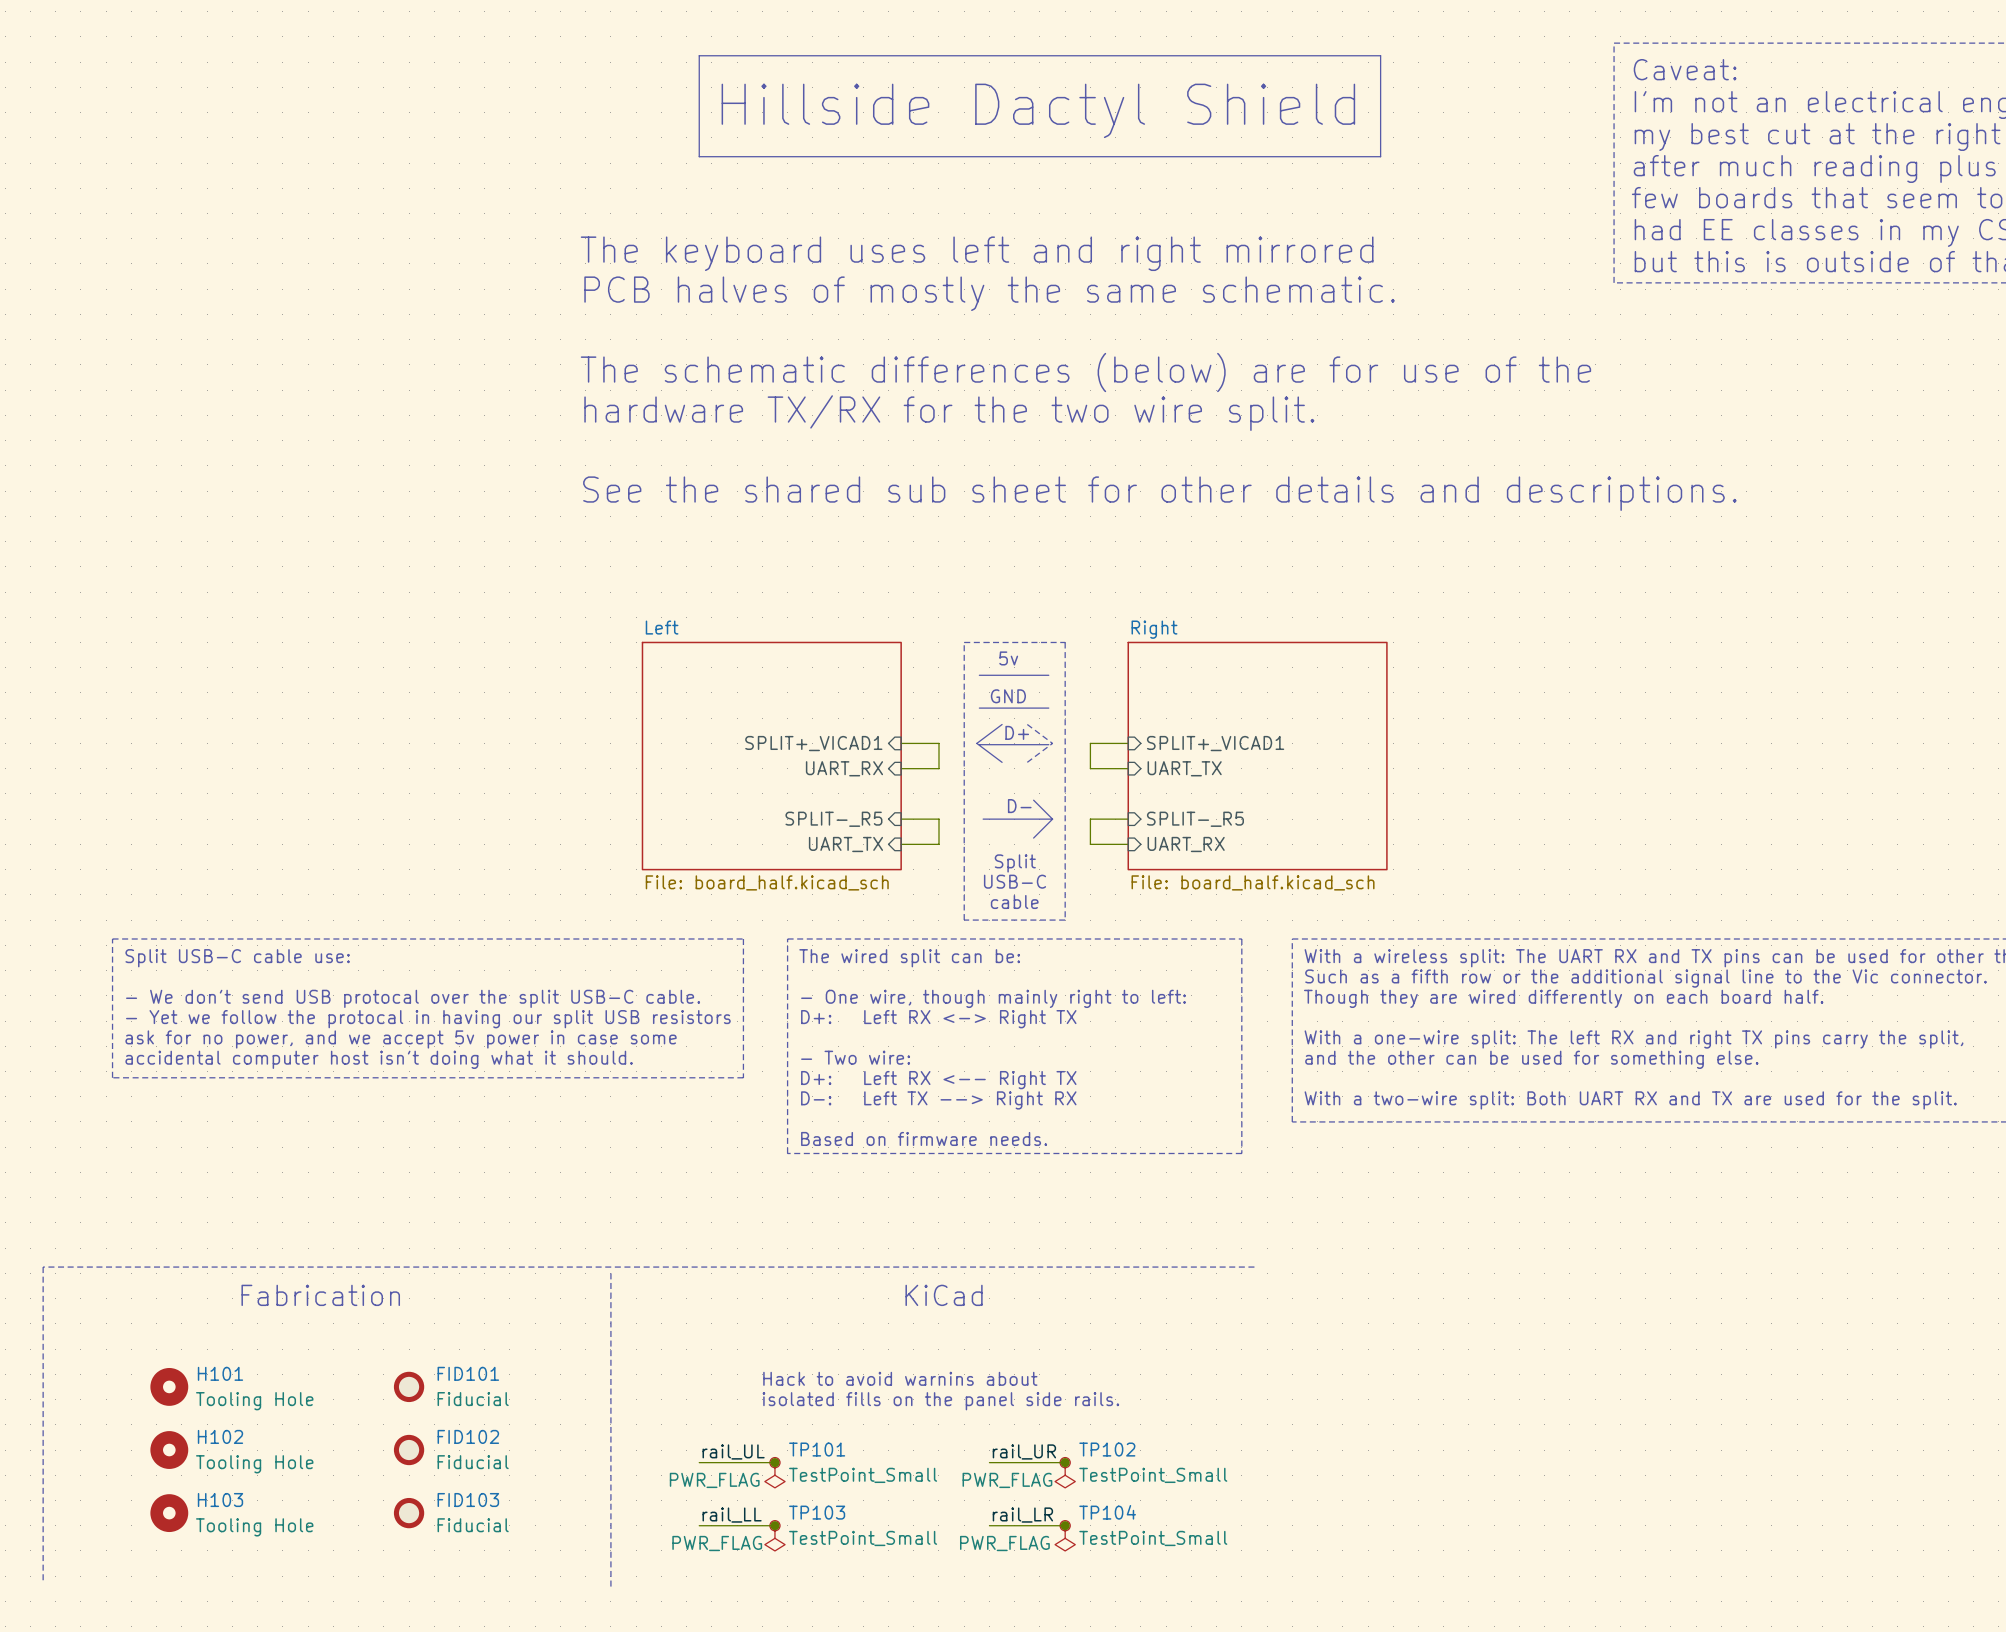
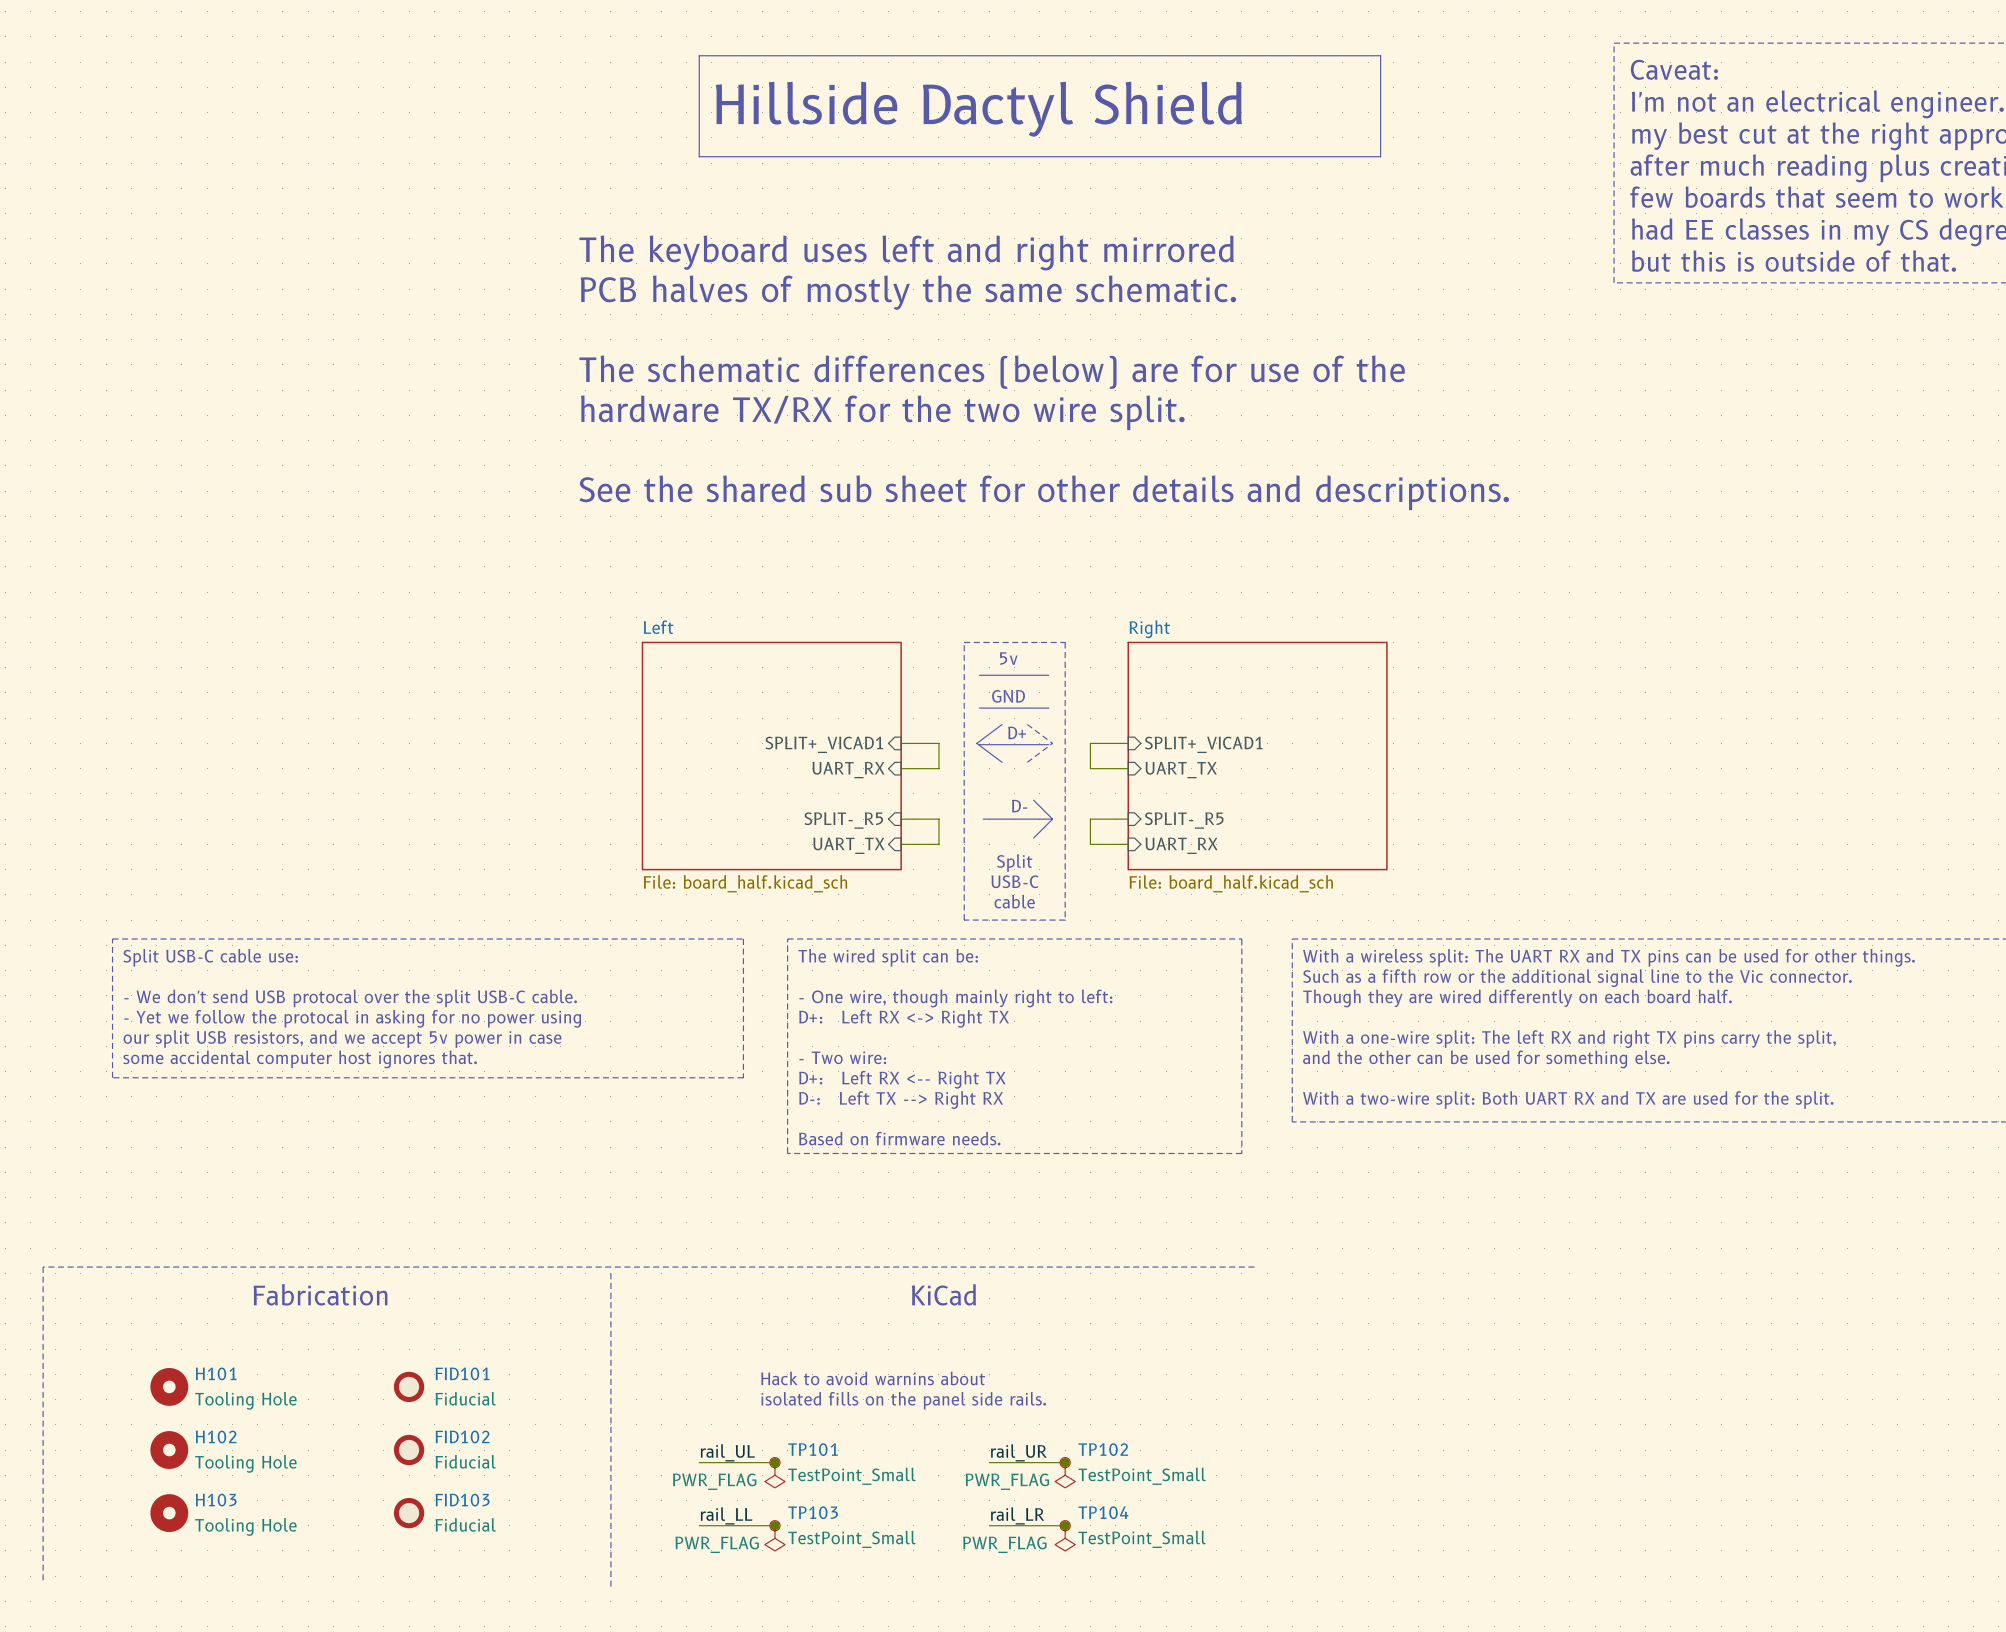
text: - Yet we follow the protocal in having our split USB resistors (428, 1019) -> - Yet we follow the protocal in asking for no power using (352, 1018)
text: ask for no power, and we accept 5v power in case some (401, 1039) -> our split USB resistors, and we accept 5v power in case (342, 1039)
text: accidental computer host isn't doing what it should. (379, 1059) -> some accidental computer host ignores that. (300, 1059)

